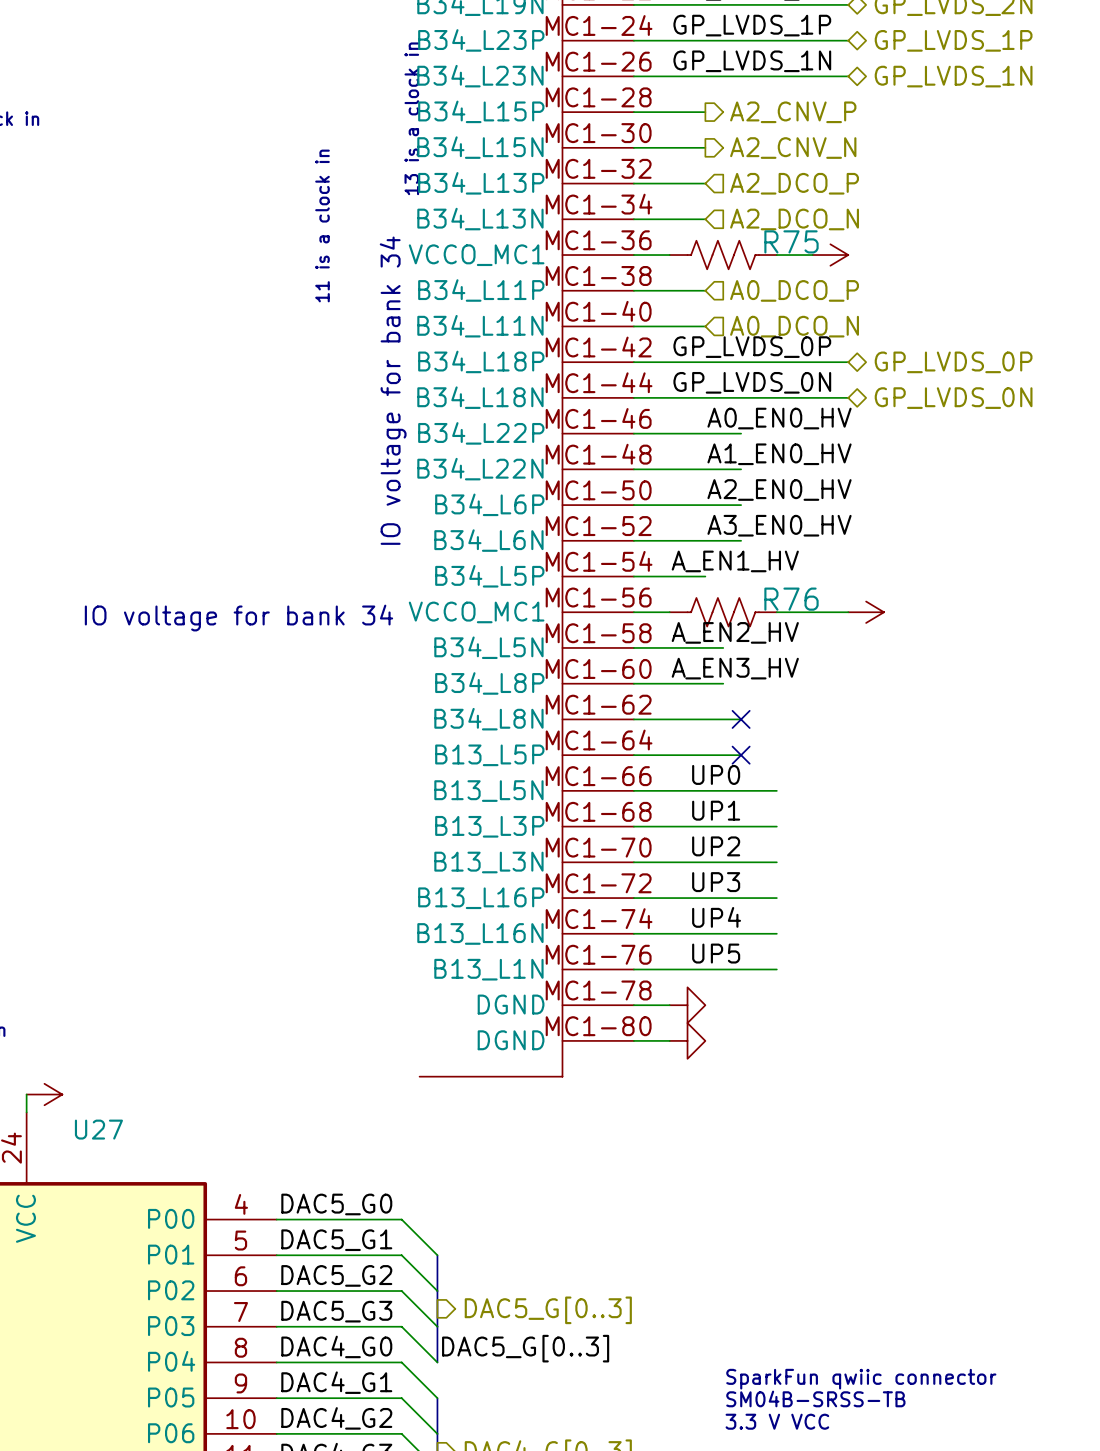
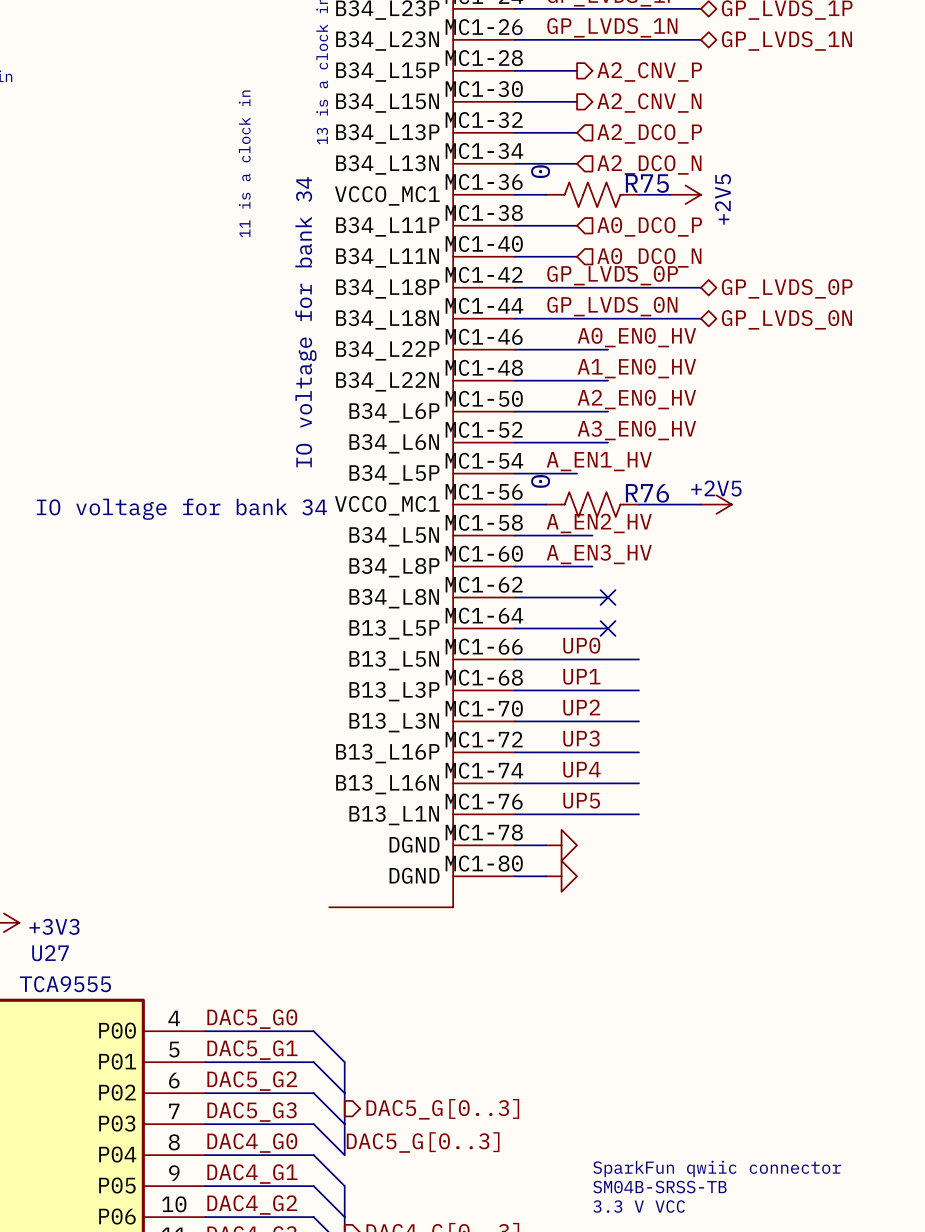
R75 value: none -> 0 (540, 171)
power symbol text: none -> +2V5 (722, 199)
R76 value: none -> 0 (540, 481)
power symbol text: none -> +2V5 (716, 488)
power symbol text: none -> +3V3 (54, 926)
U27 value: none -> TCA9555 (65, 984)

